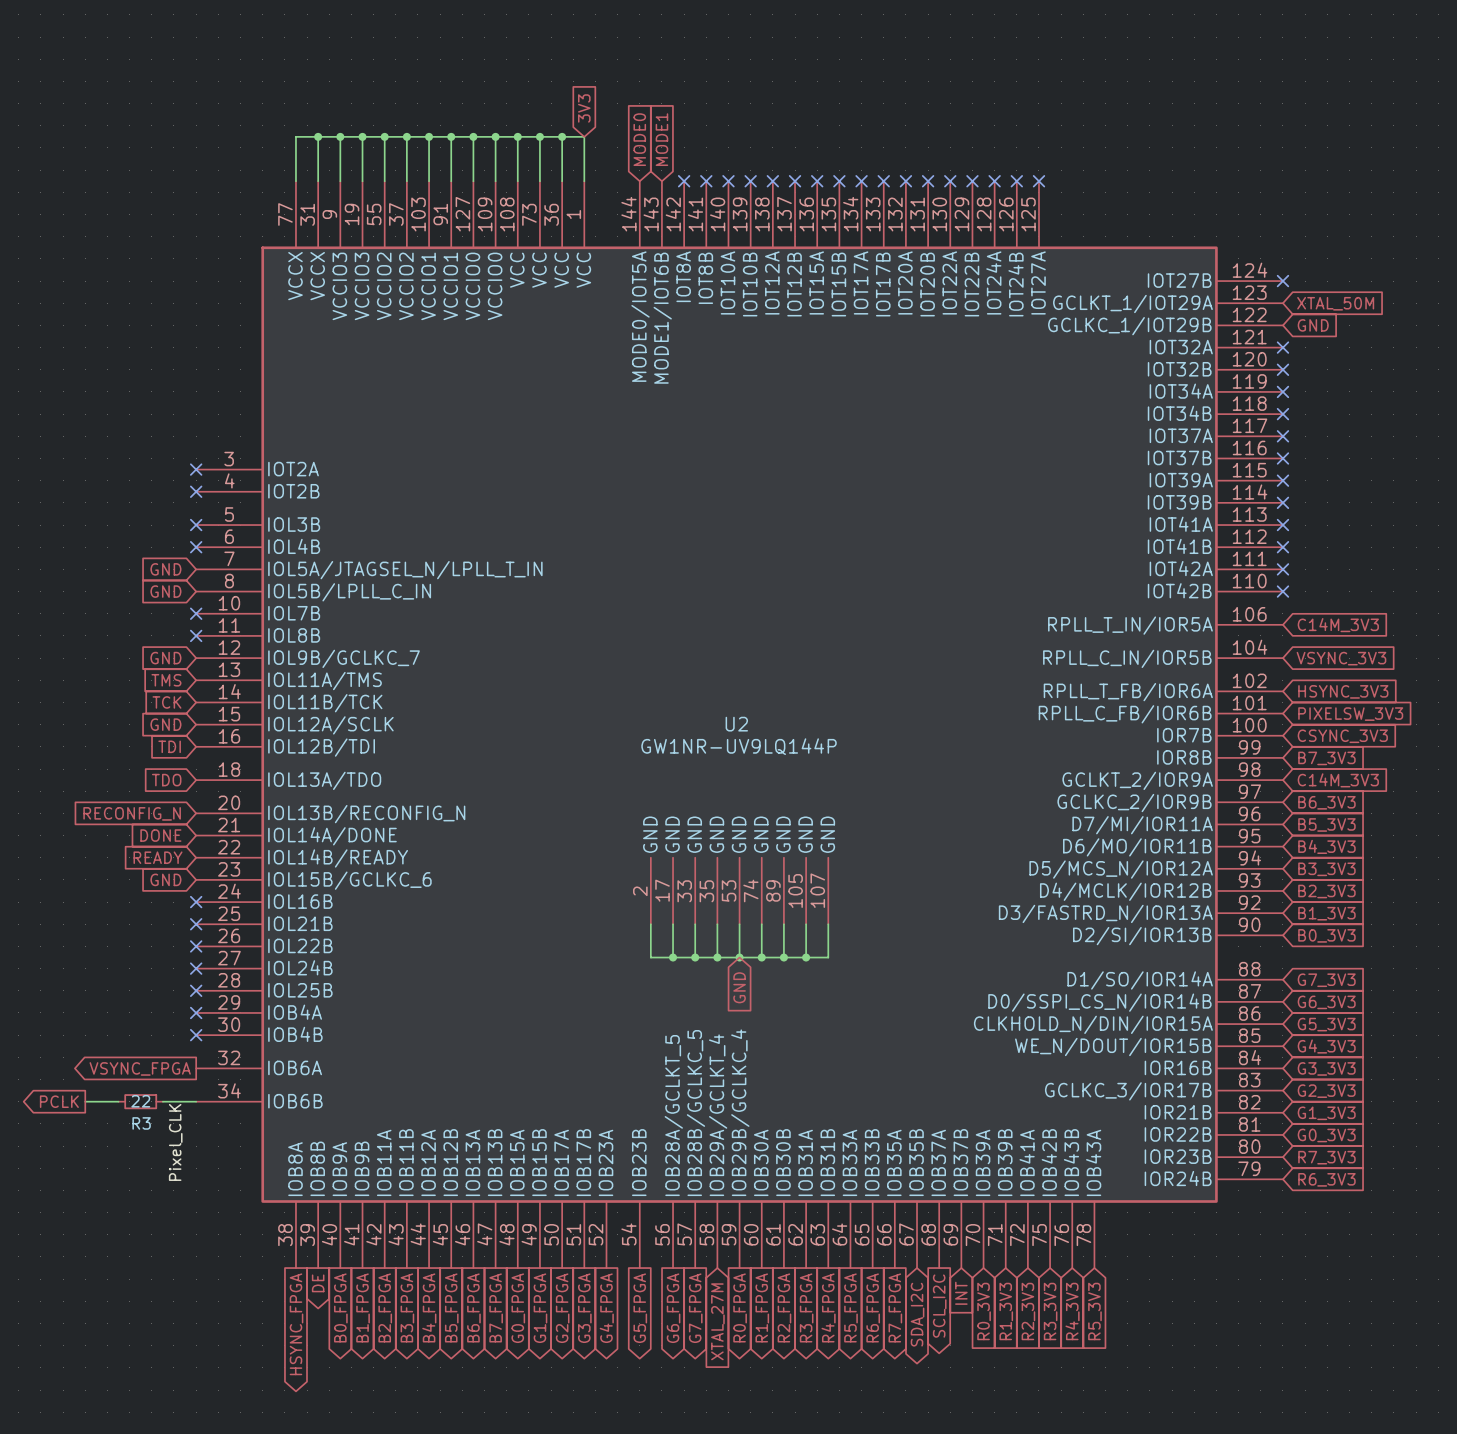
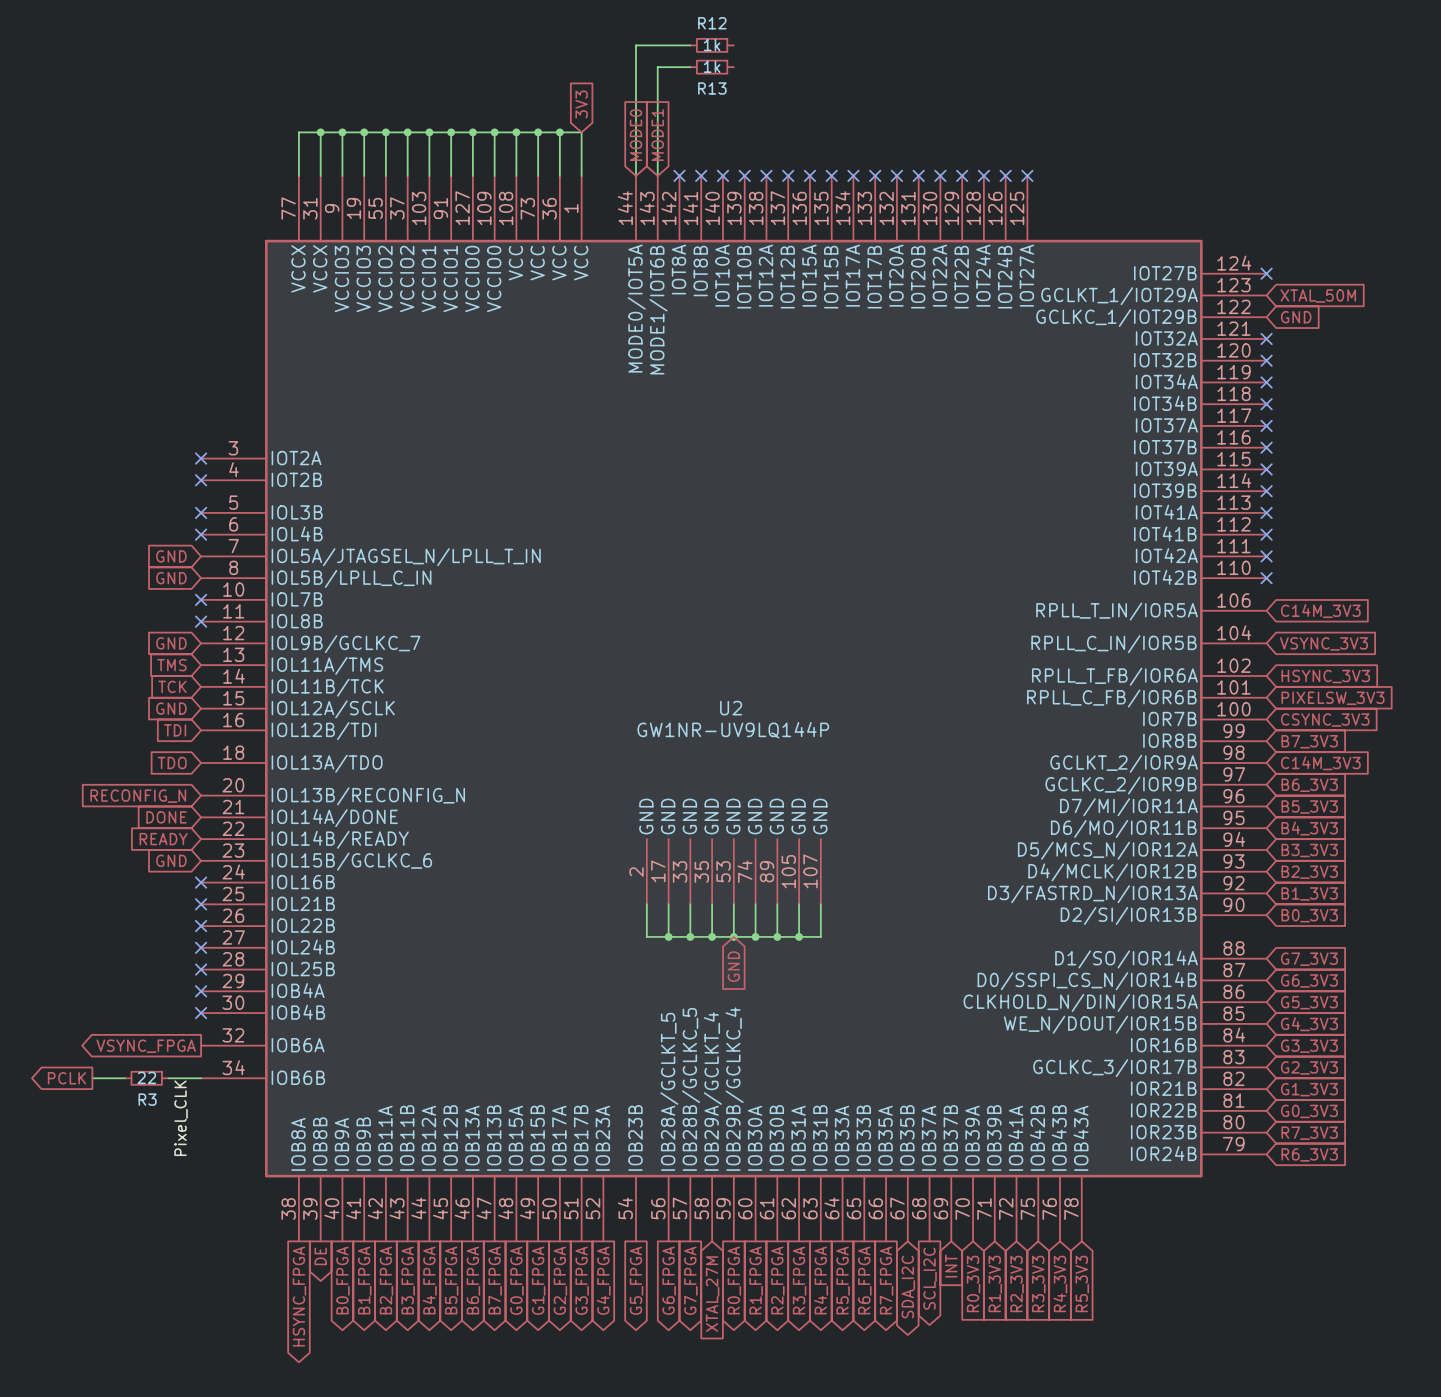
wire: none -> (690, 45) (635, 45) (635, 175)
R12: none -> 1k (712, 45)
wire: none -> (690, 67) (657, 67) (657, 175)
R13: none -> 1k (712, 67)

